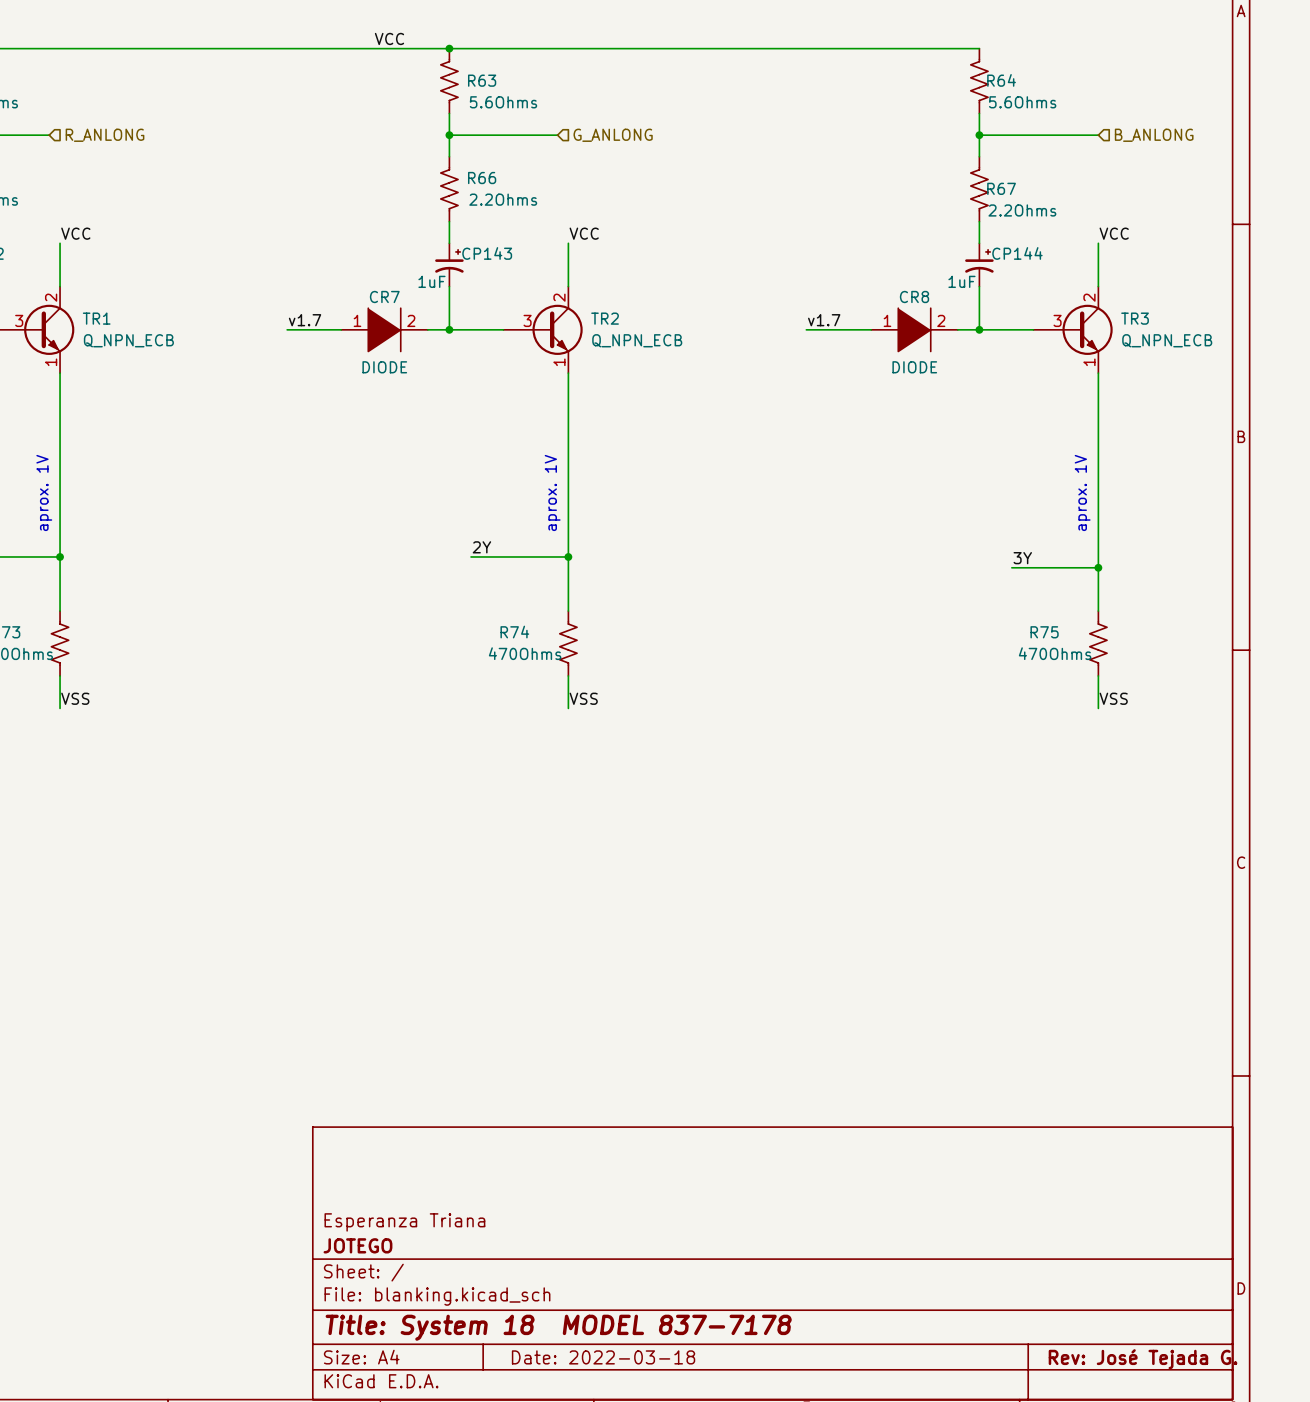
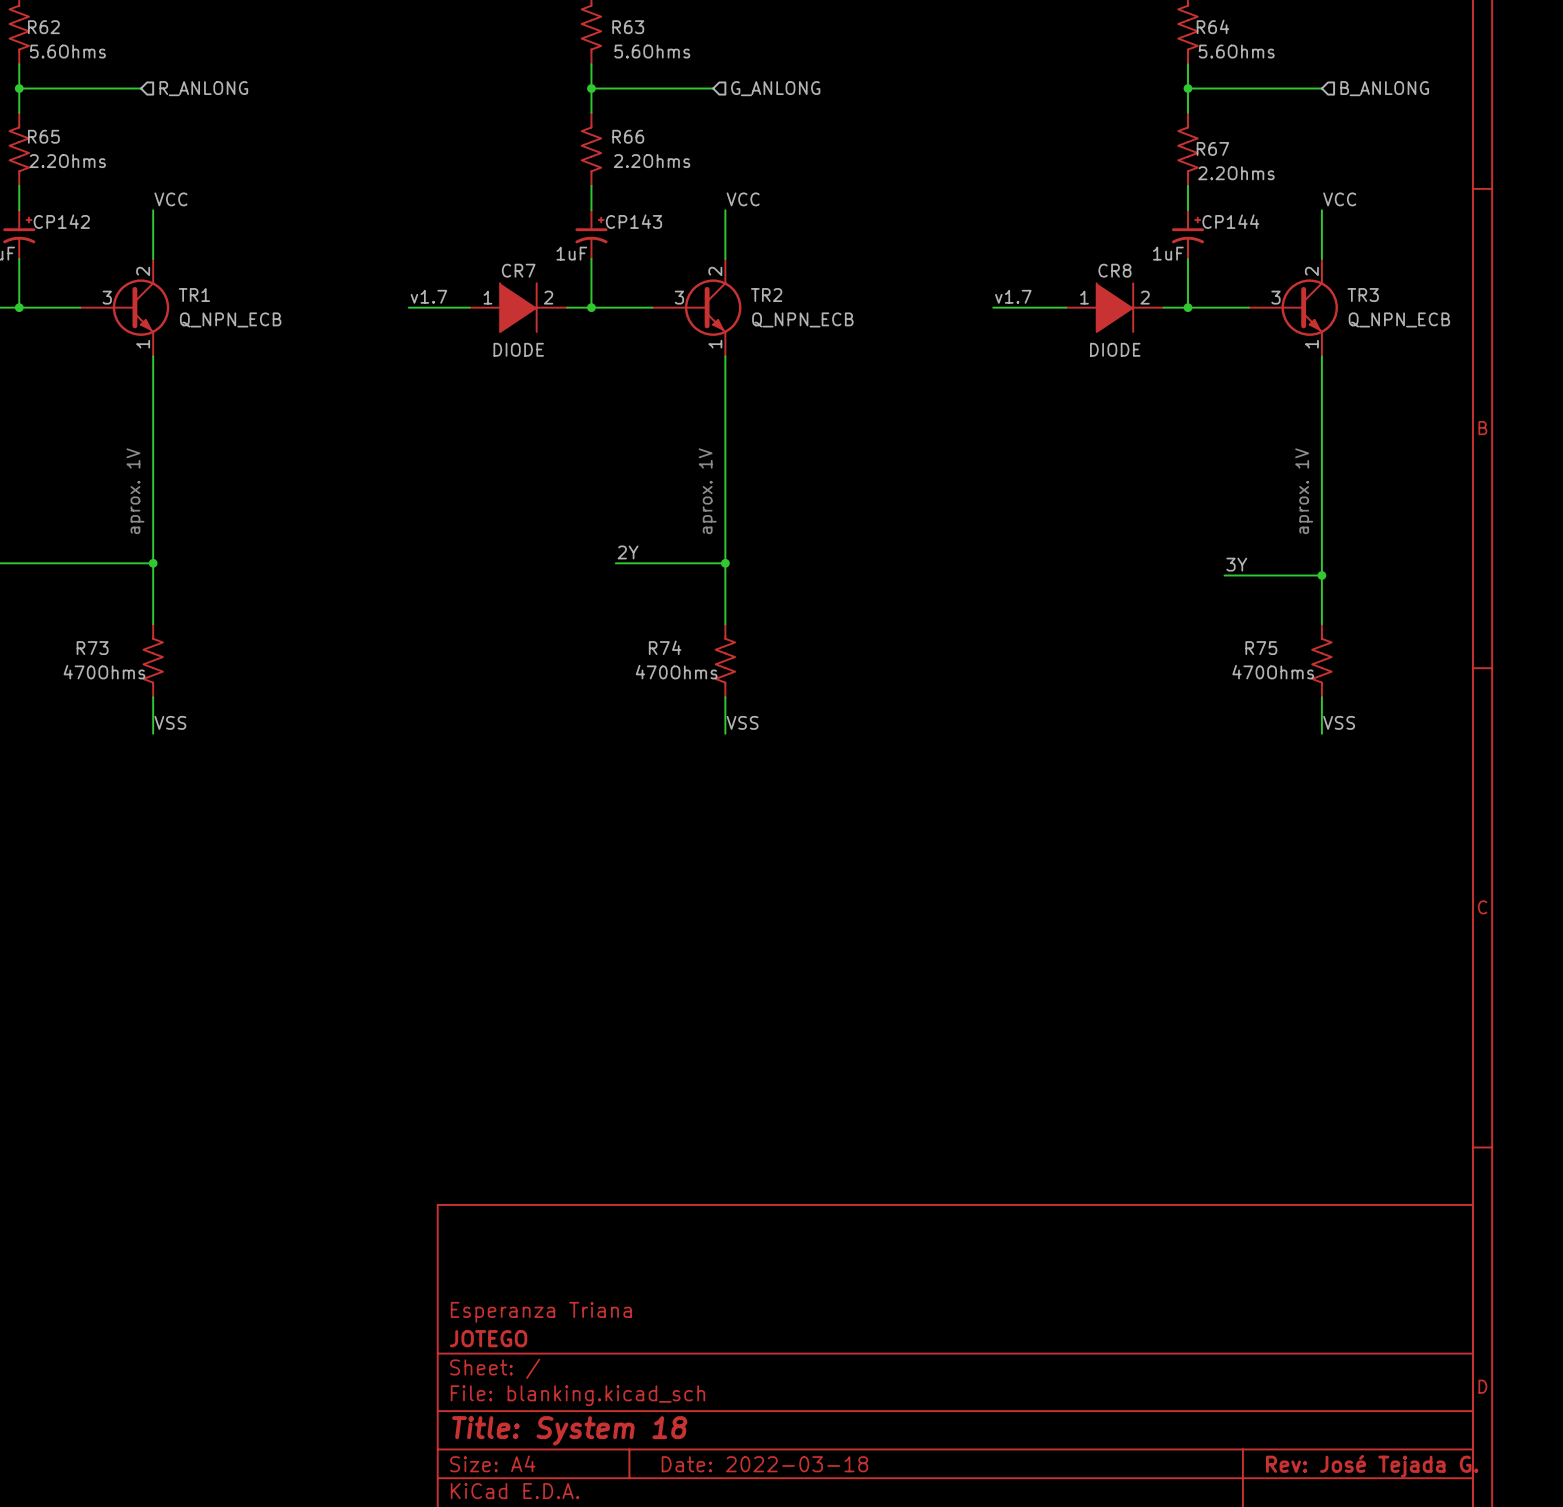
title block: Title: System 18 MODEL 837-7178 (558, 1327) -> Title: System 18 (569, 1430)

